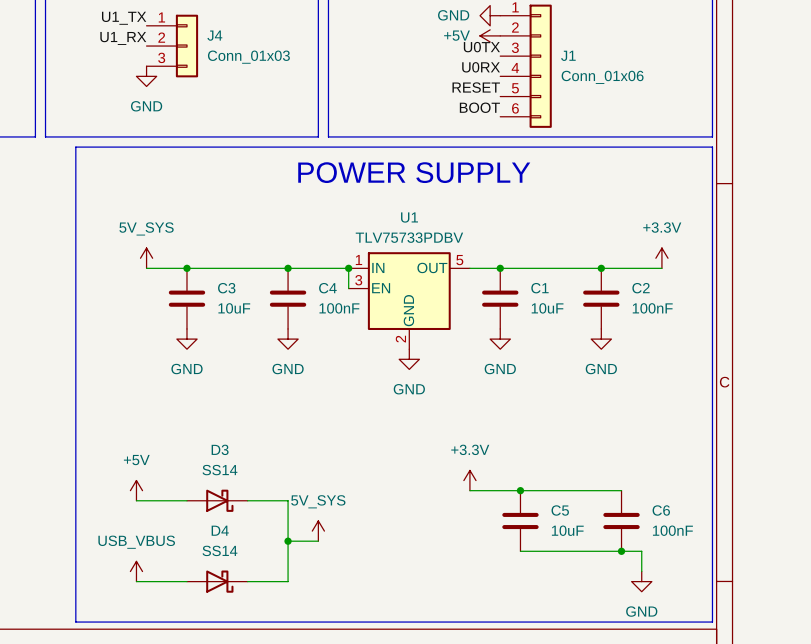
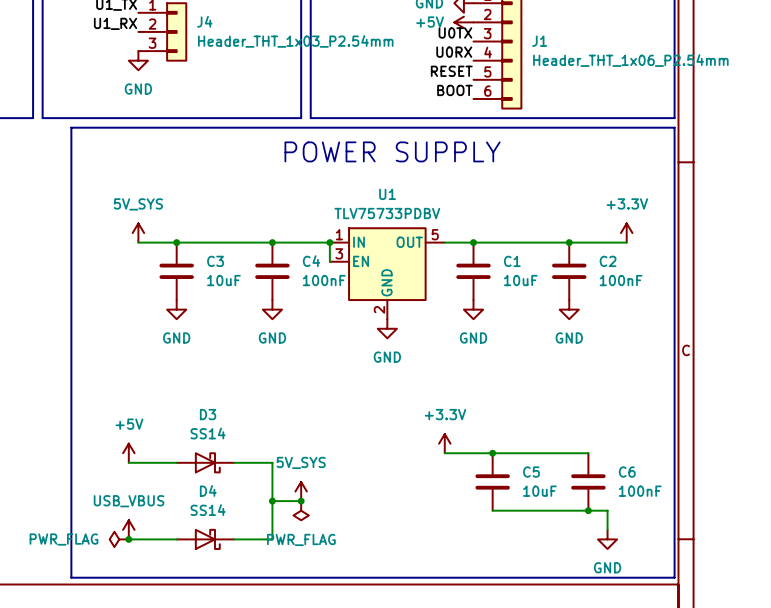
J4 value: Conn_01x03 (248, 57) -> Header_THT_1x03_P2.54mm (295, 41)
J1 value: Conn_01x06 (602, 77) -> Header_THT_1x06_P2.54mm (630, 60)
junction: none -> (301, 501)
power symbol: none -> PWR_FLAG (301, 510)
power symbol: none -> PWR_FLAG (119, 539)
junction: none -> (128, 539)

